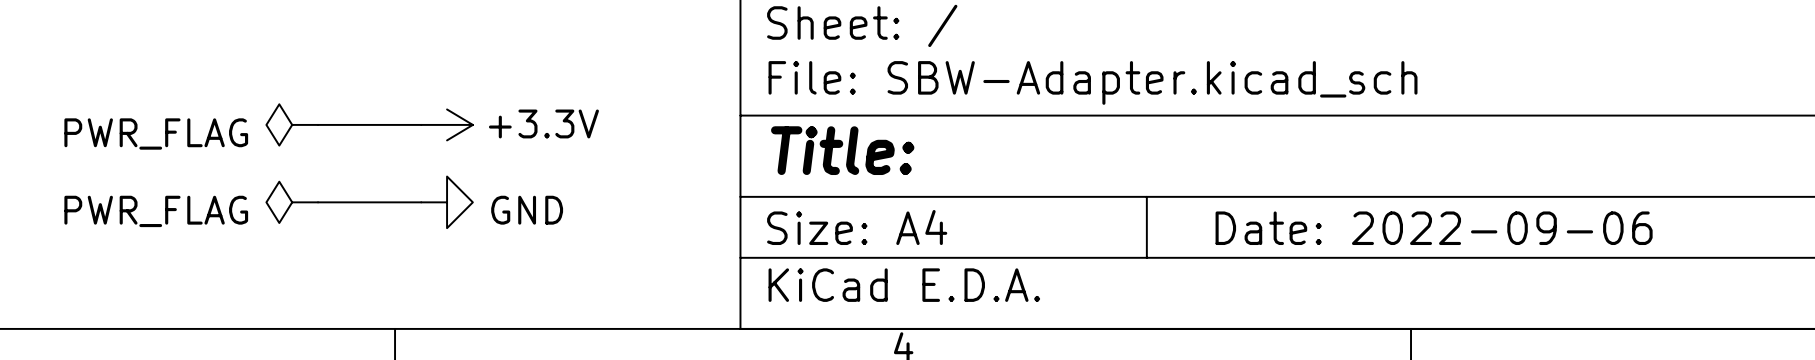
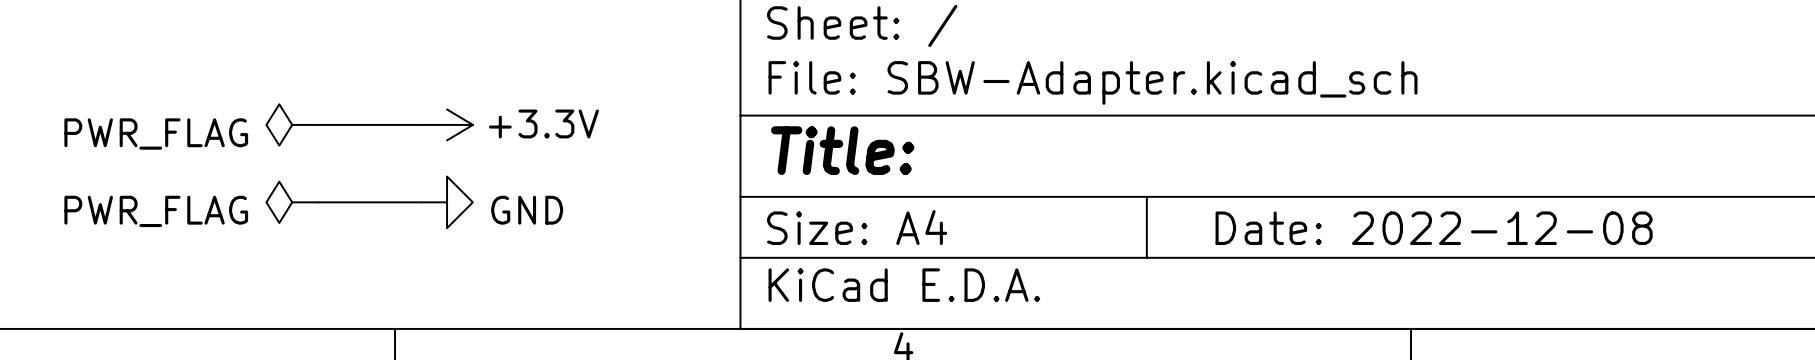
title block: Date: 2022-09-06 (1434, 228) -> Date: 2022-12-08 (1434, 228)

